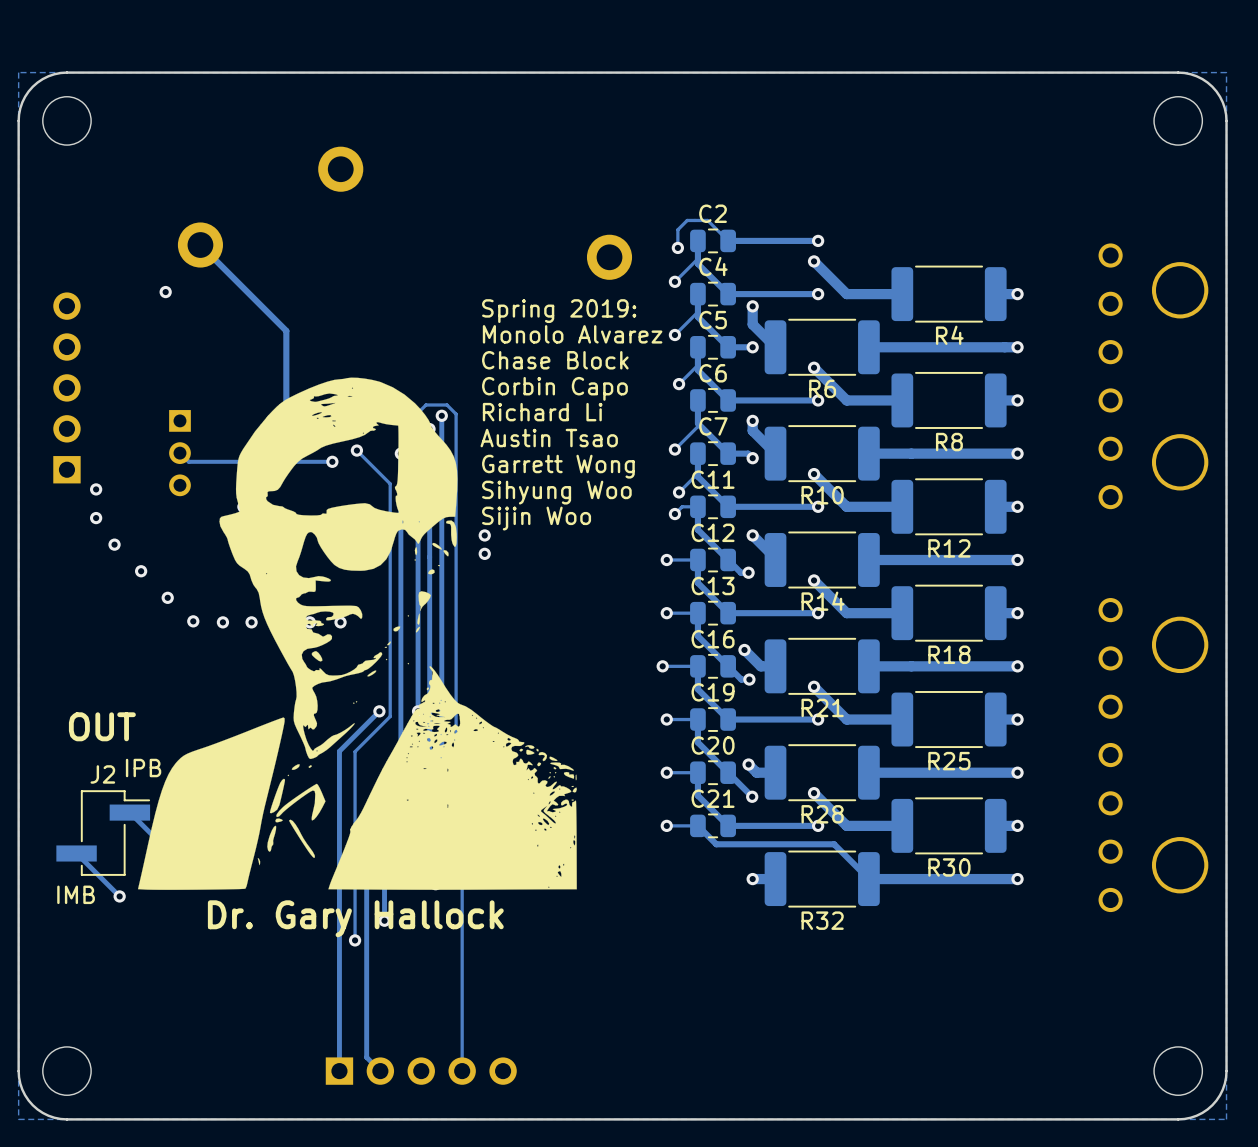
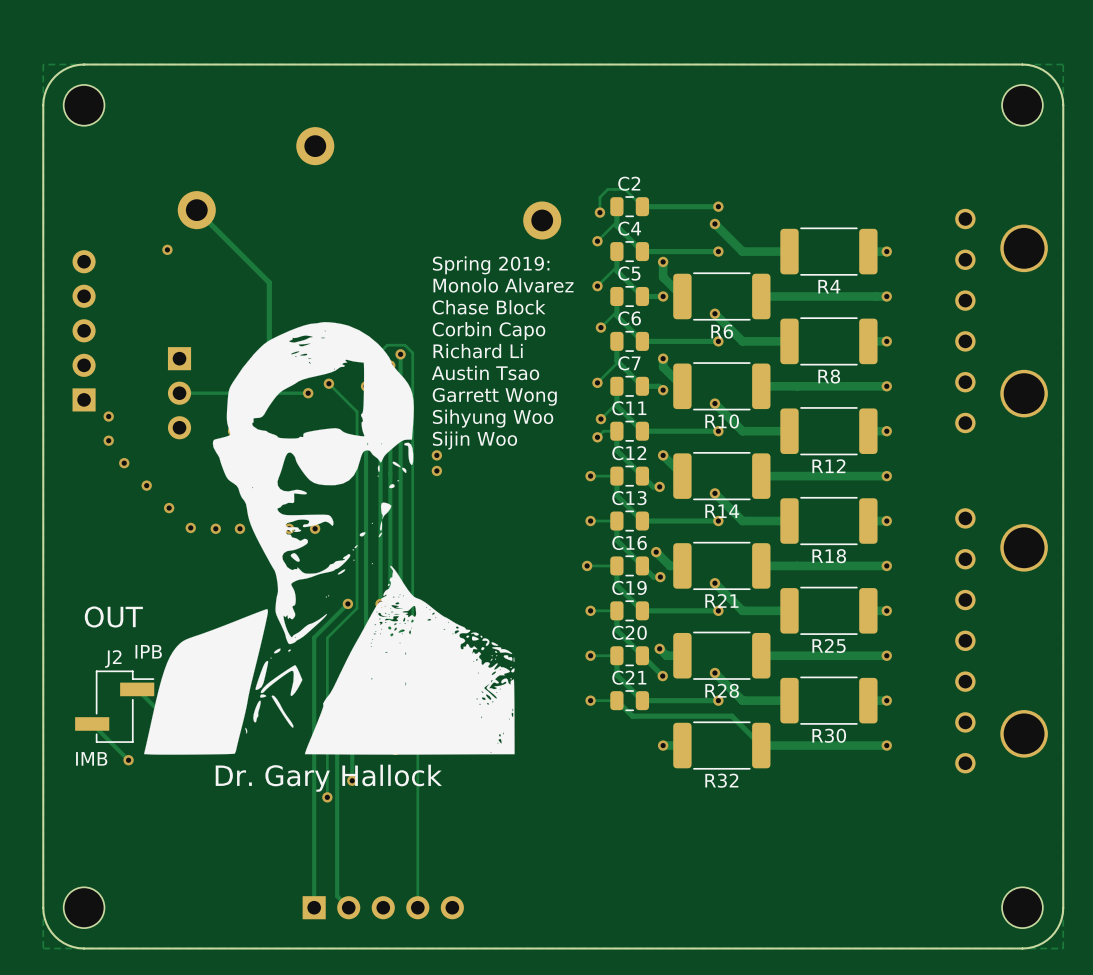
part footprint: [169, 410, 191, 497] -> [167, 347, 192, 440]

